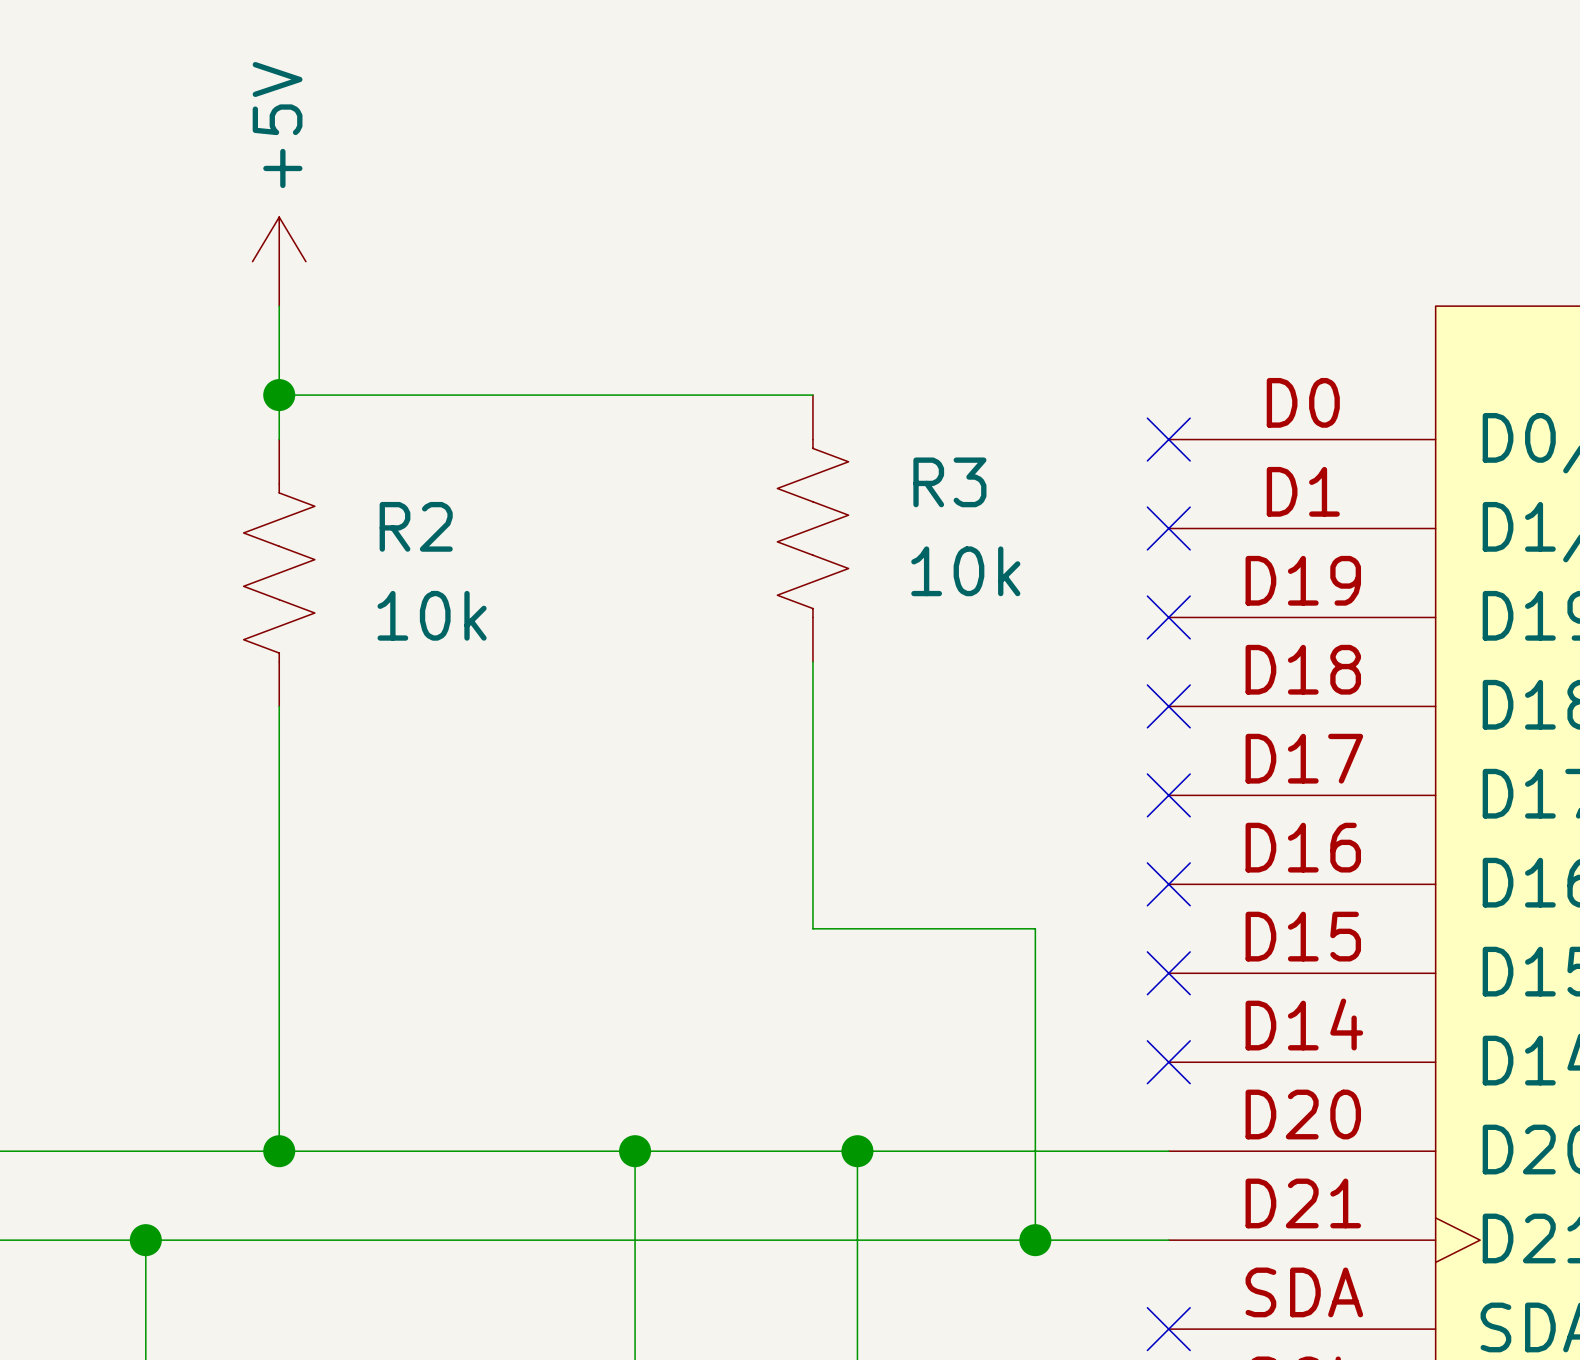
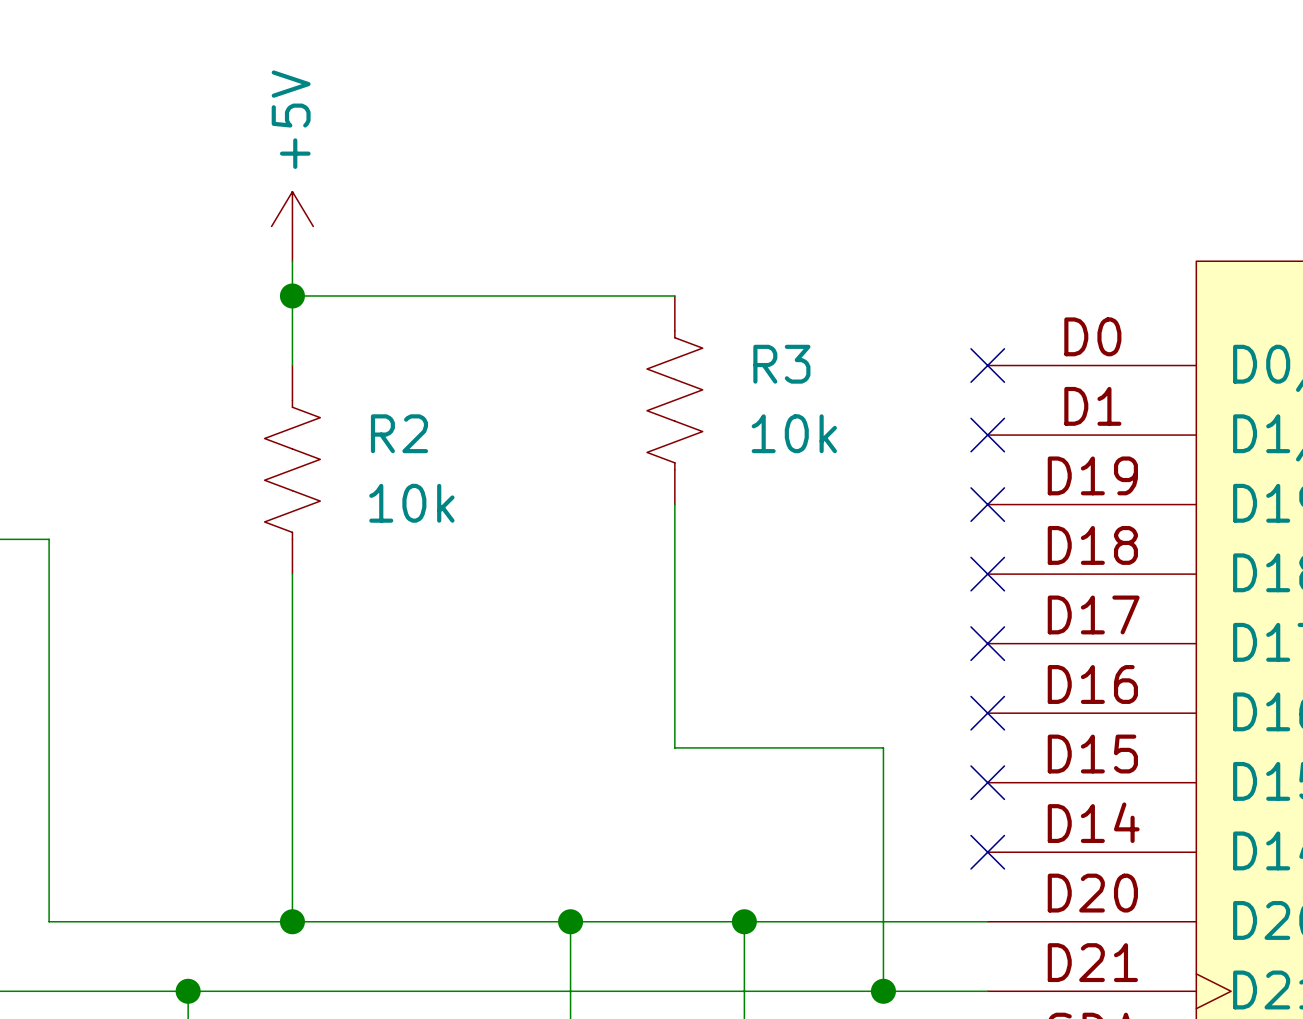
wire: none -> (292, 295) (674, 295)
wire: (279, 395) (812, 395) -> none
junction position: (279, 395) -> (292, 295)
R3 position: (812, 528) -> (674, 400)
wire: (812, 661) (812, 928) -> (674, 504) (674, 747) (709, 747)

